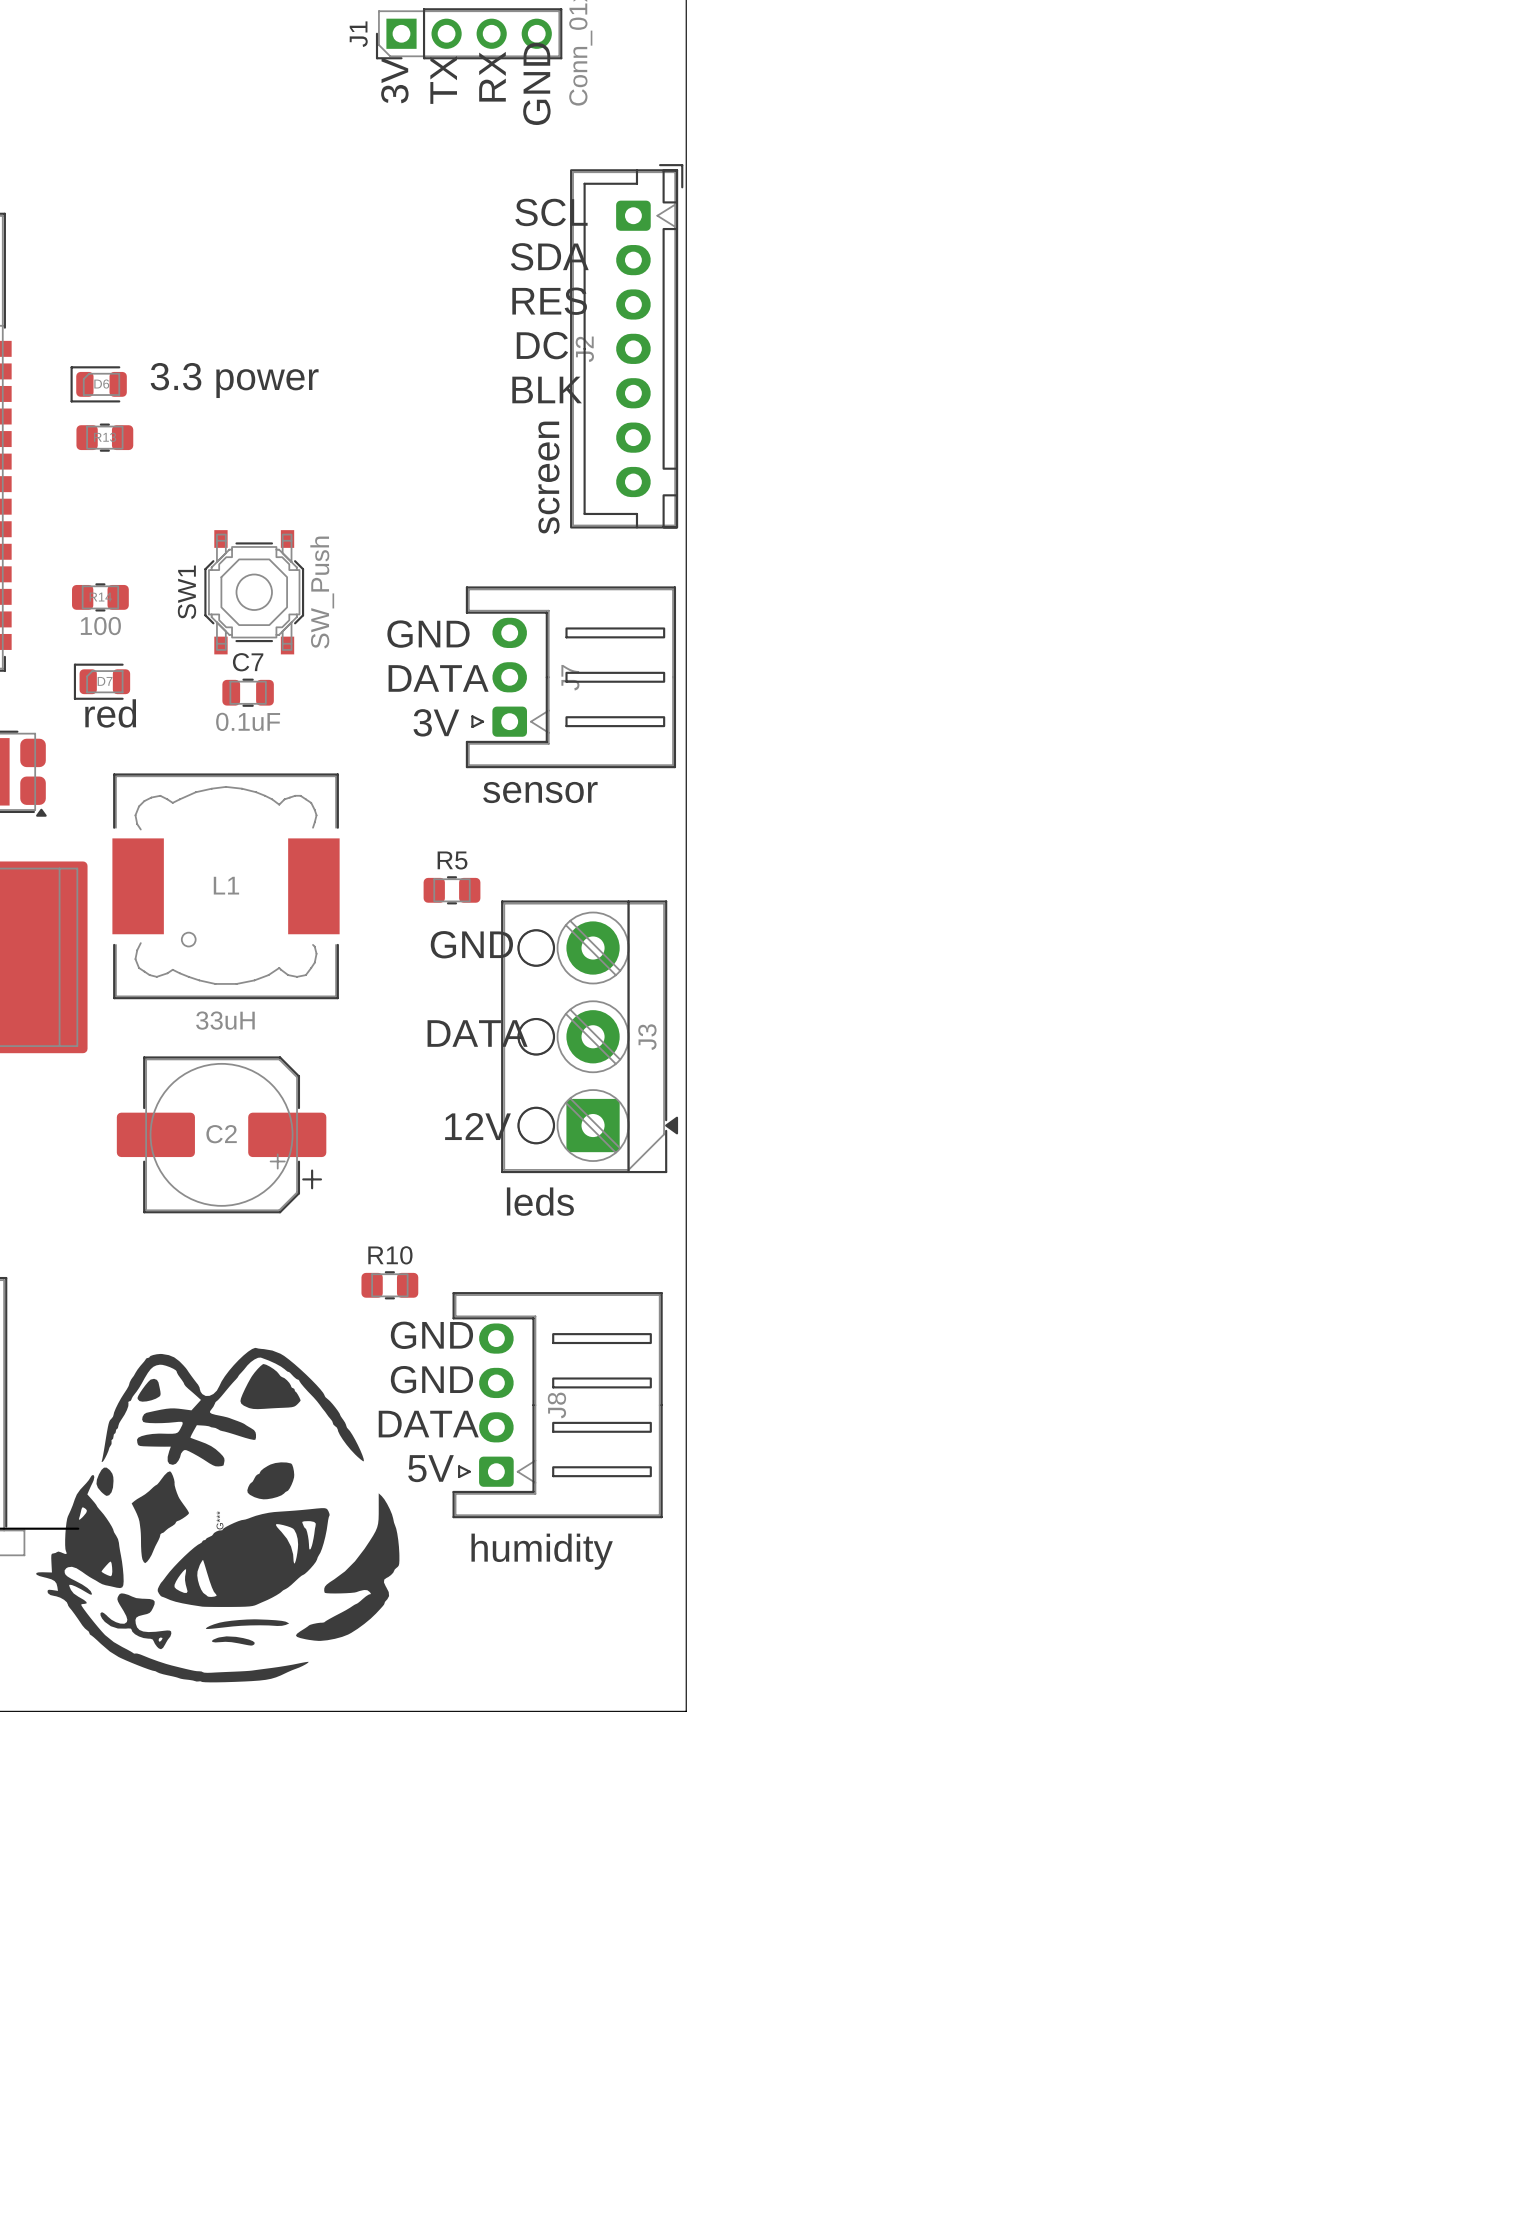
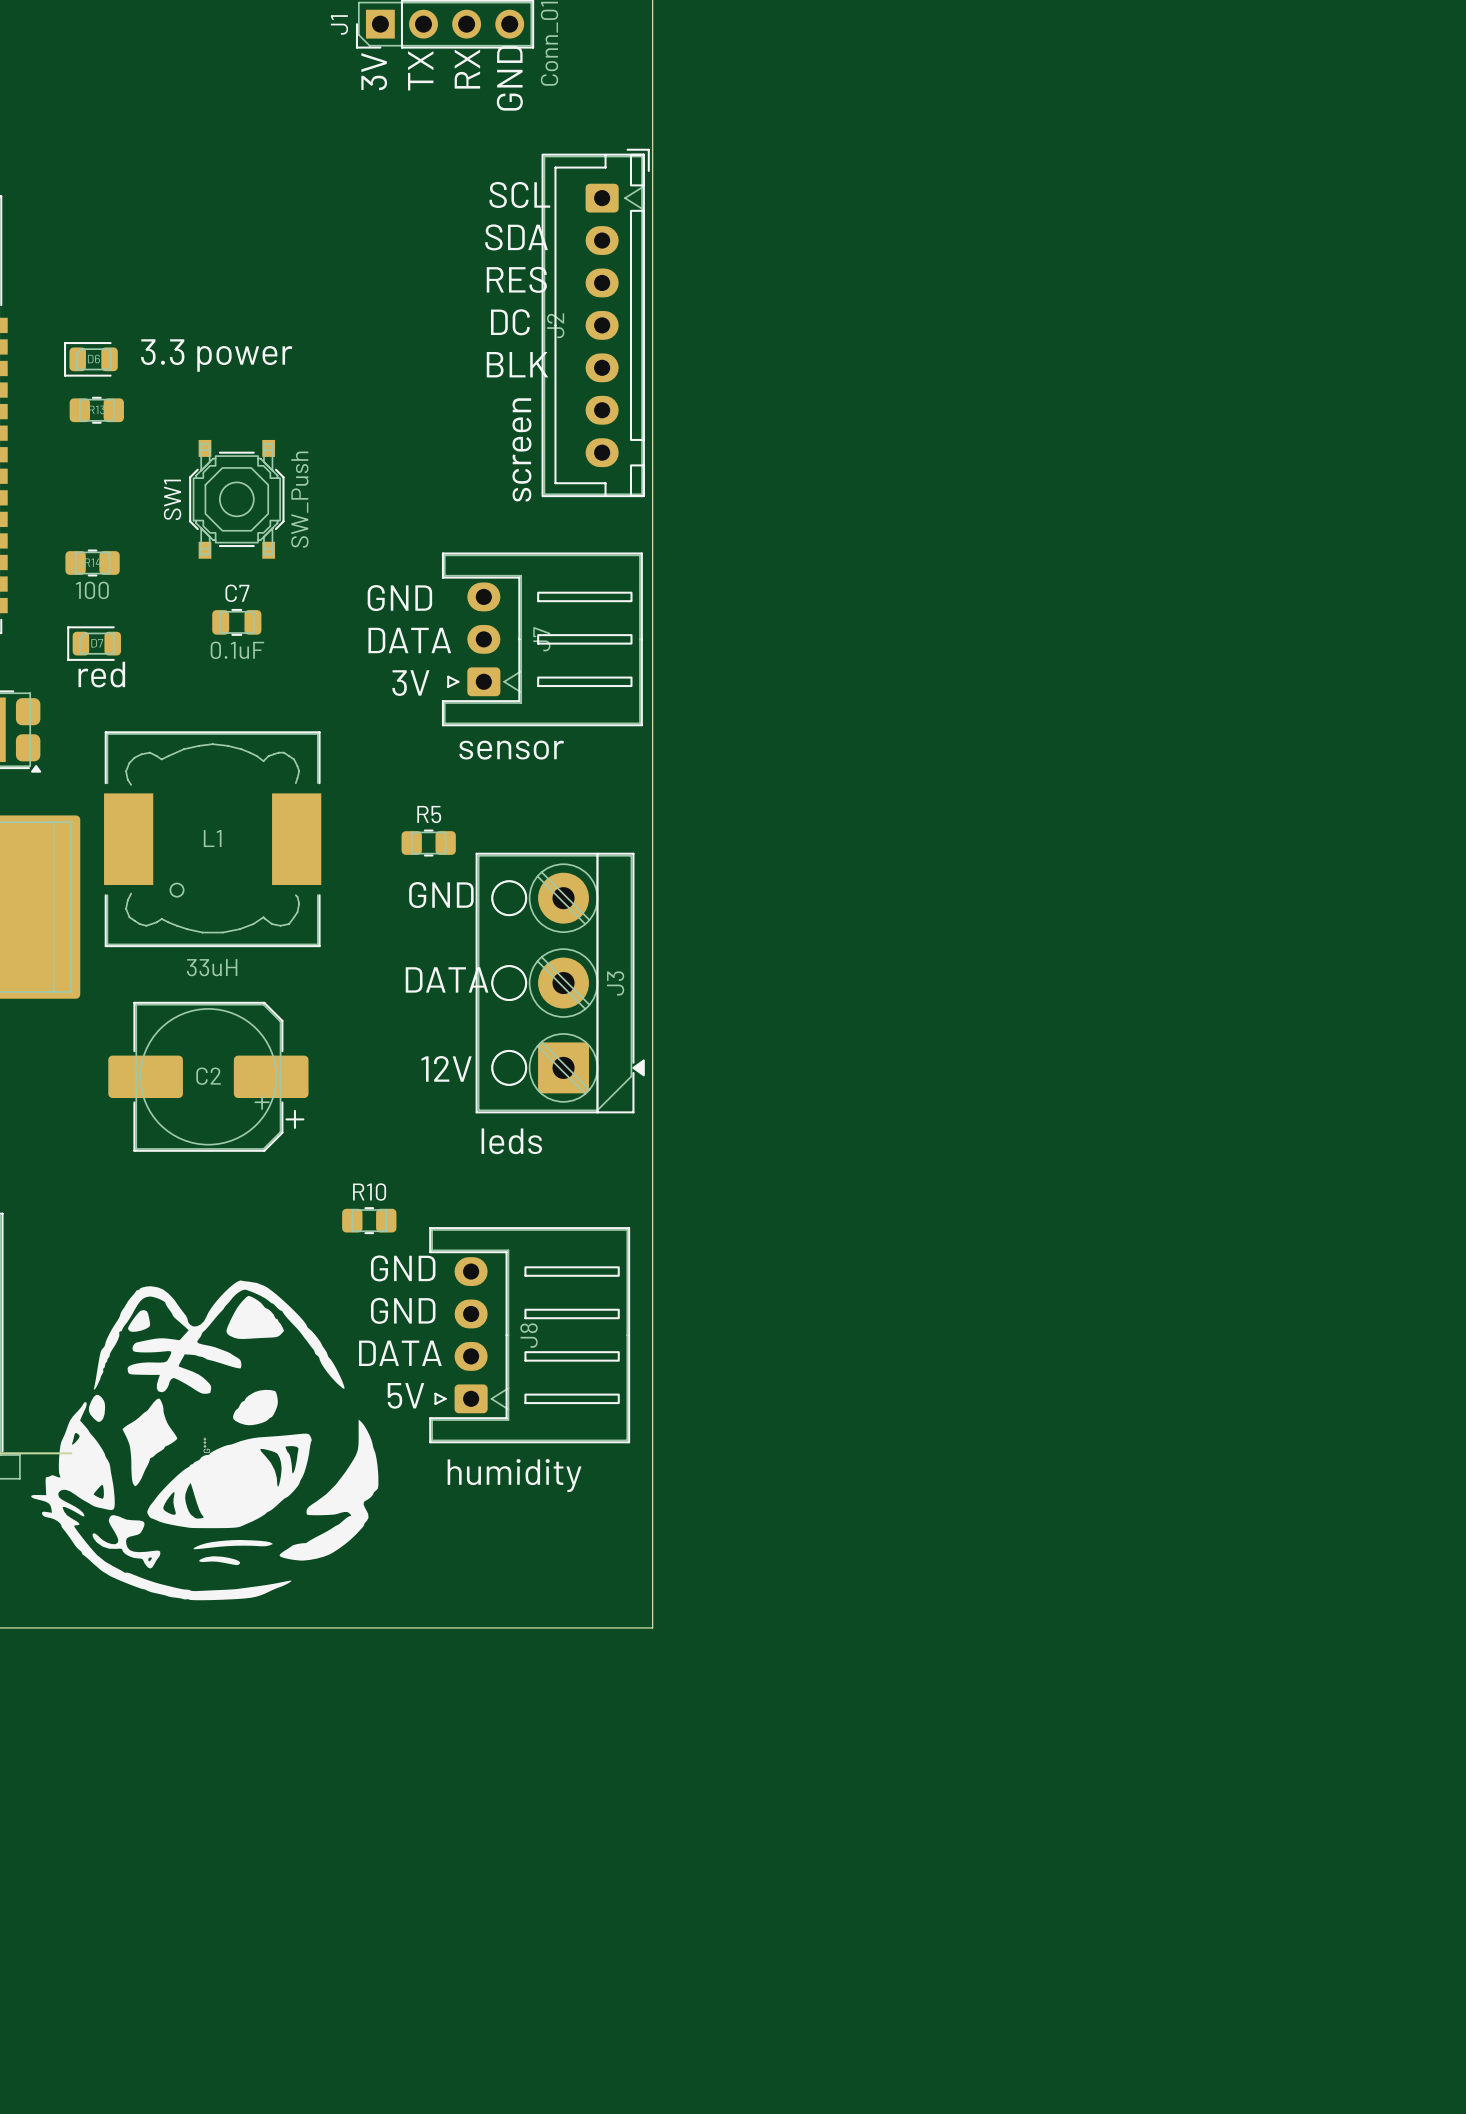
SW1 position: (254, 592) -> (236, 499)
C7 position: (248, 692) -> (236, 622)

